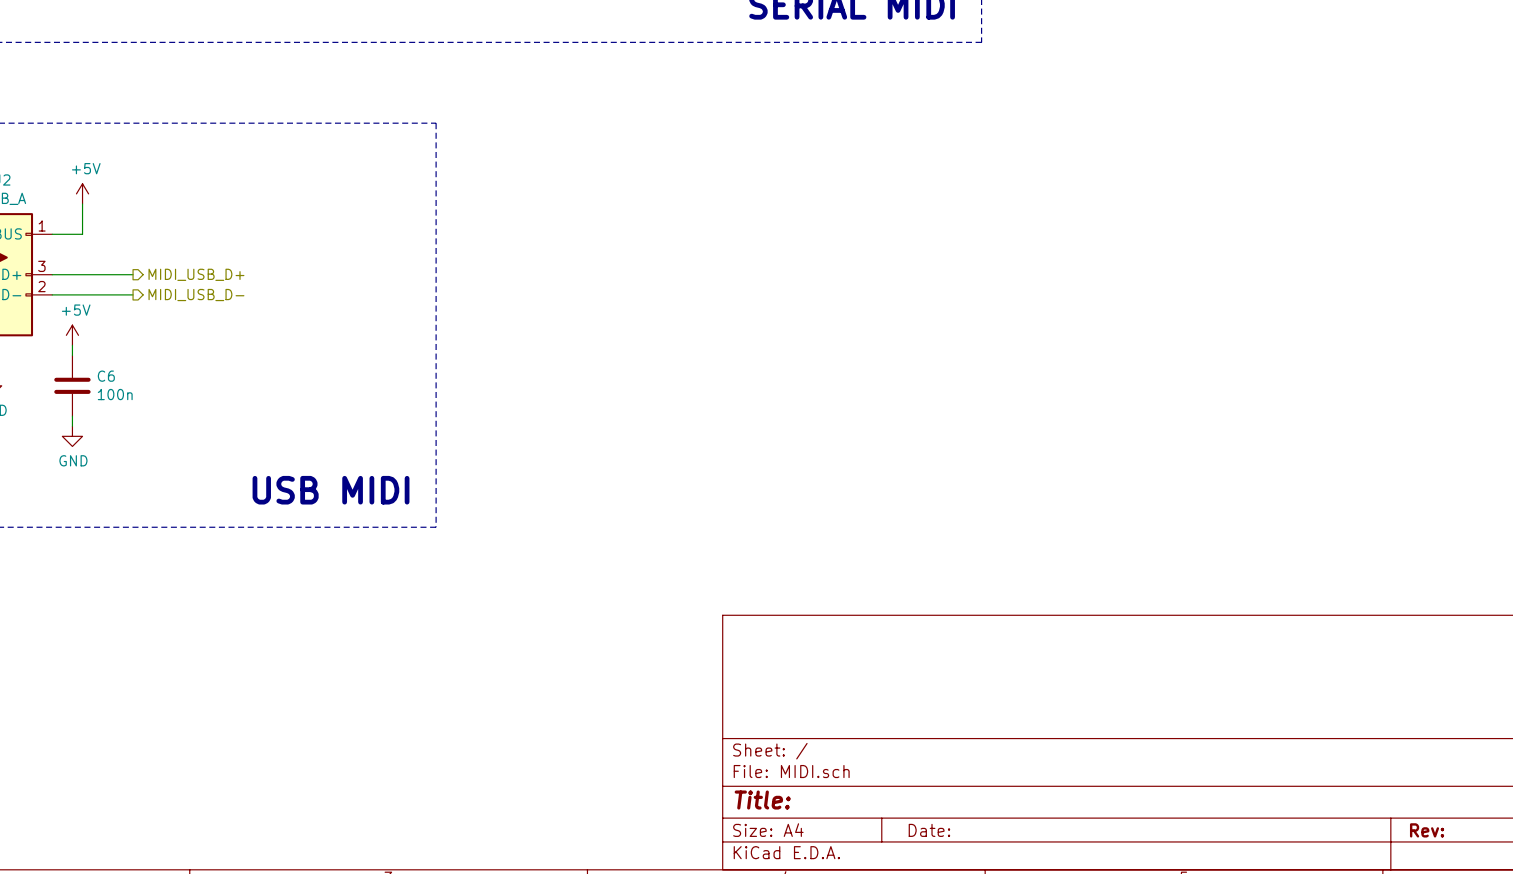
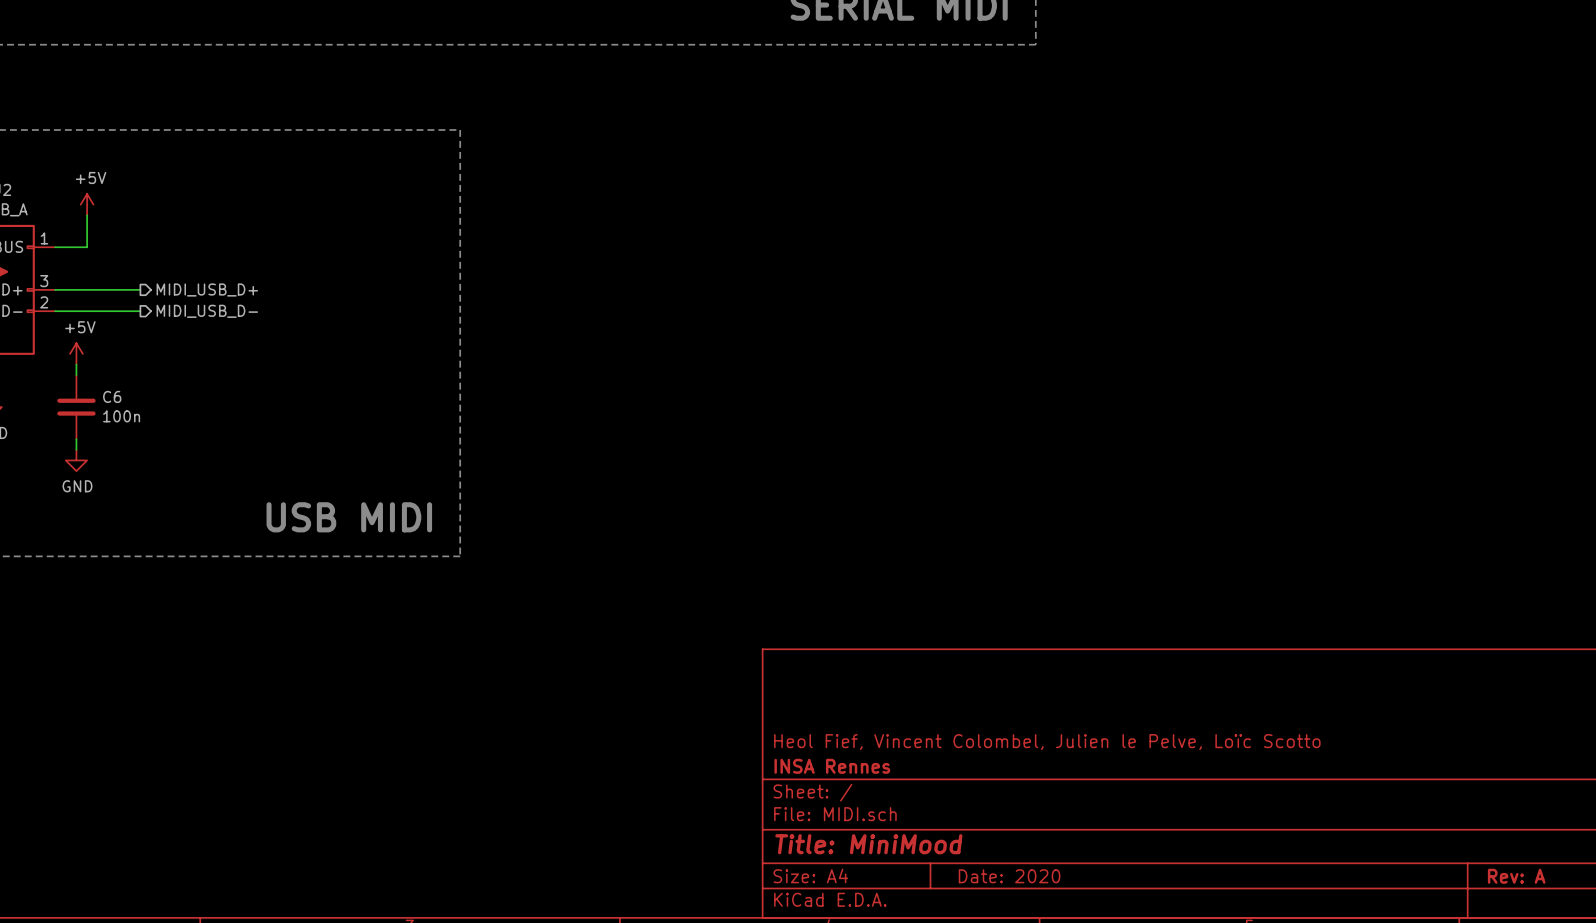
title block: none -> Heol Fief, Vincent Colombel, Julien le Pelve, Loïc Scotto (1047, 742)
title block: none -> INSA Rennes (832, 766)
title block: Title: (762, 800) -> Title: MiniMood (868, 844)
title block: Date: (929, 830) -> Date: 2020 (1009, 876)
title block: Rev: (1427, 830) -> Rev: A (1516, 876)

